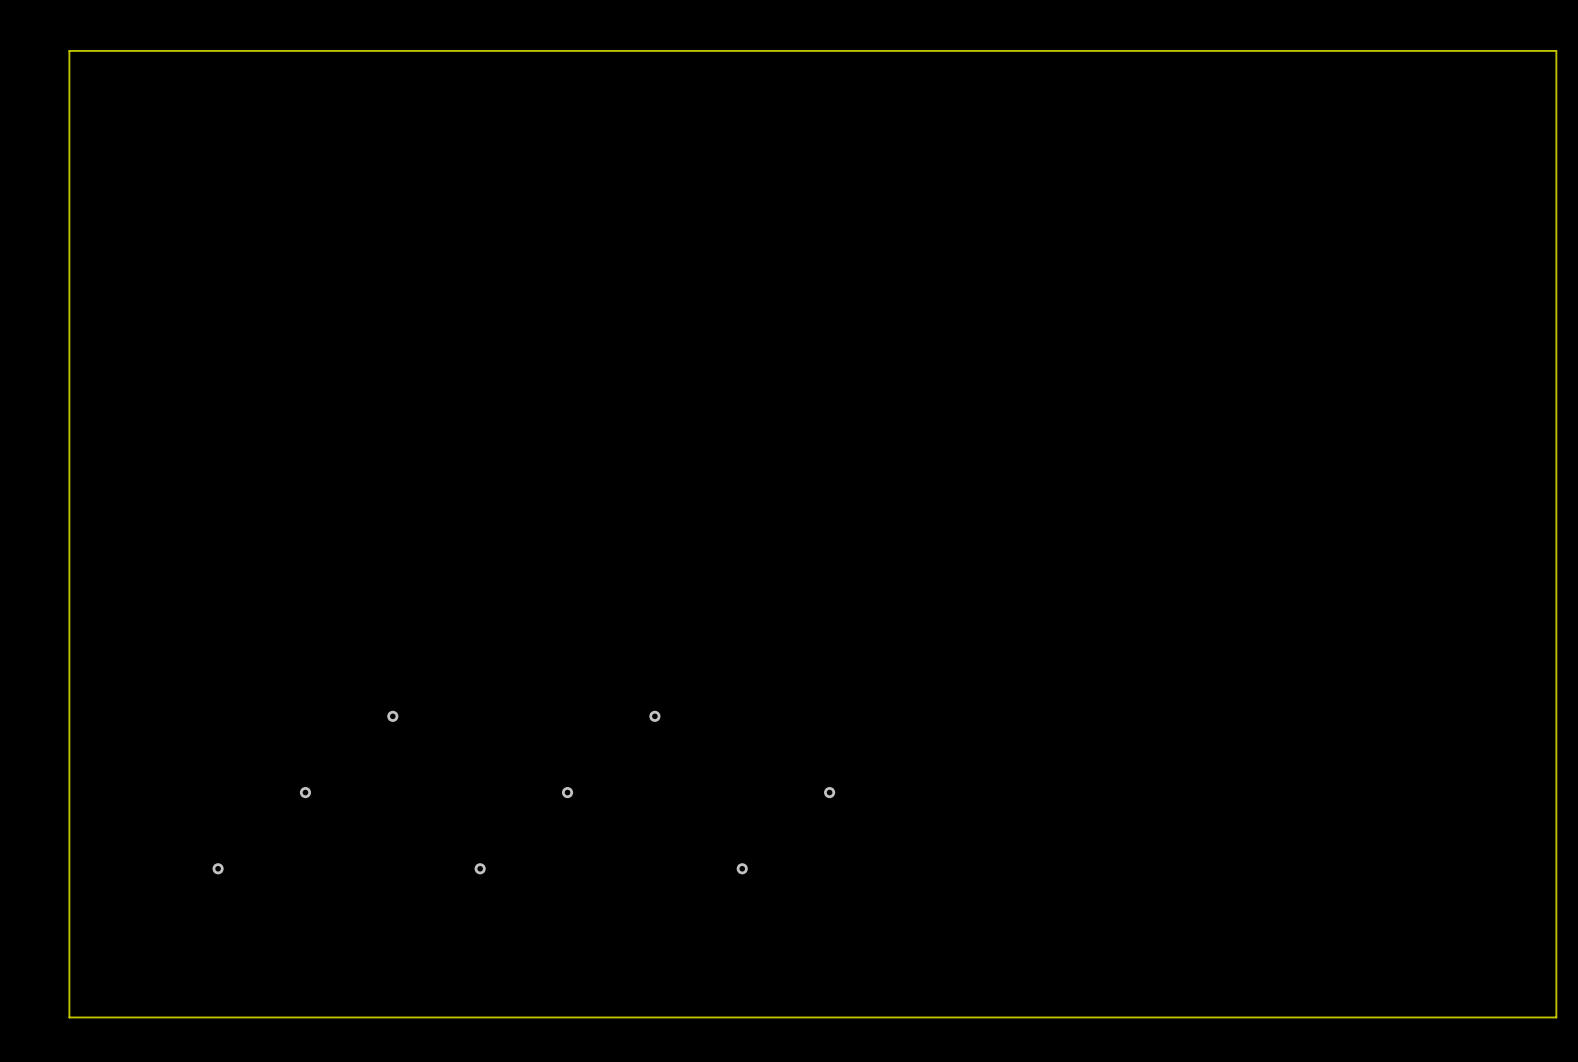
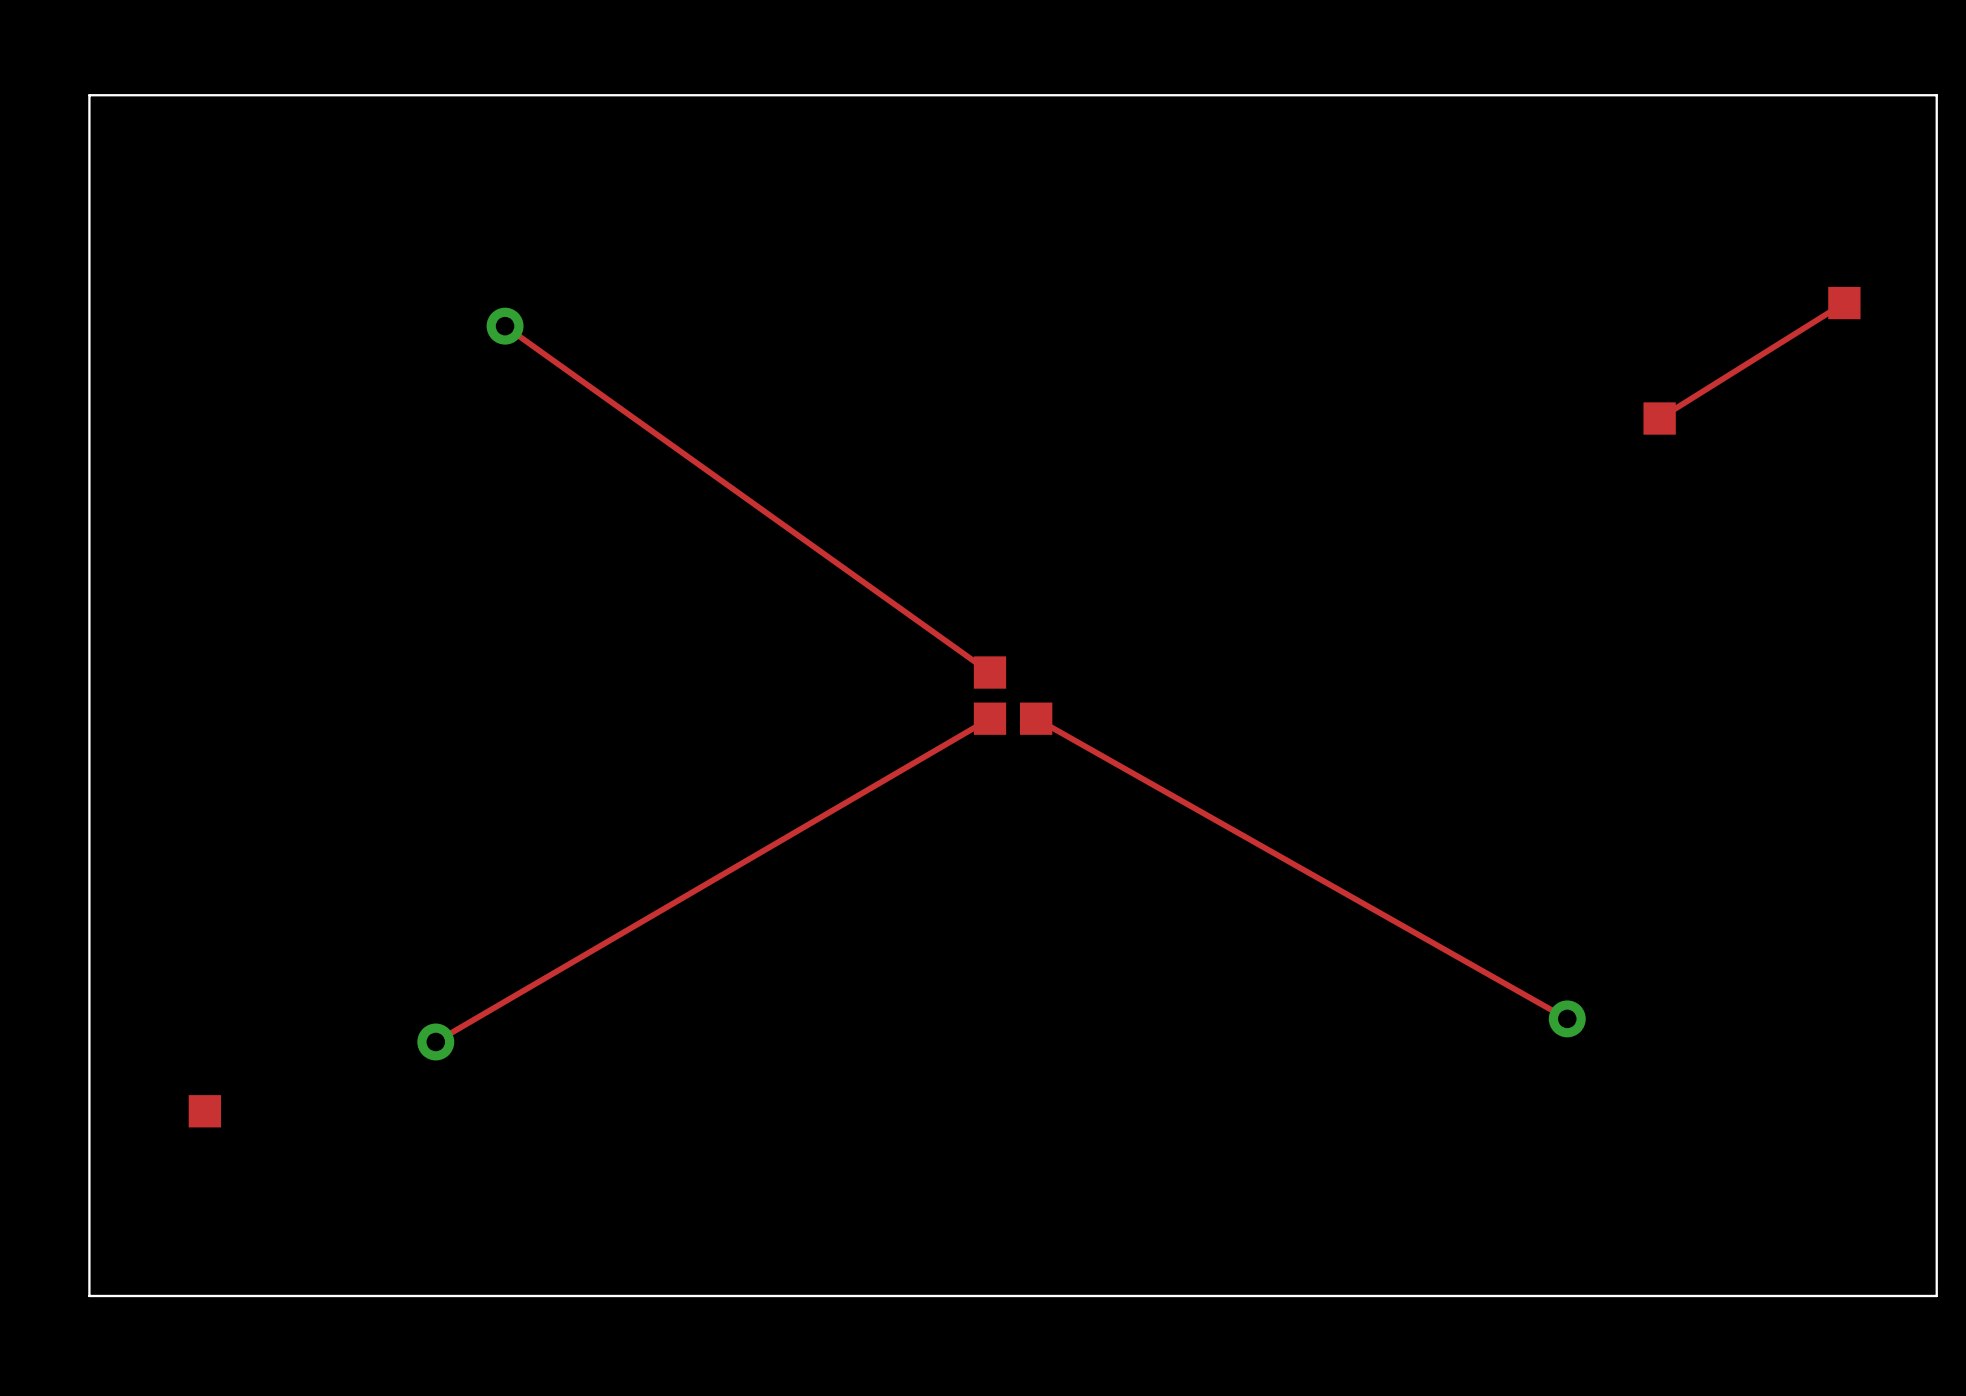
track: none -> (1844, 303) (1659, 418)
part: none -> (1844, 303)
track: none -> (505, 326) (989, 672)
part: none -> (505, 326)
part: none -> (1659, 418)
part: none -> (1013, 695)
track: none -> (989, 718) (435, 1041)
track: none -> (1036, 718) (1567, 1018)
via: (392, 716) -> none
via: (654, 716) -> none
via: (305, 792) -> none
via: (567, 792) -> none
via: (829, 792) -> none
part: none -> (1567, 1018)
part: none -> (435, 1041)
part: none -> (204, 1111)
via: (218, 868) -> none
via: (480, 868) -> none
via: (742, 868) -> none

